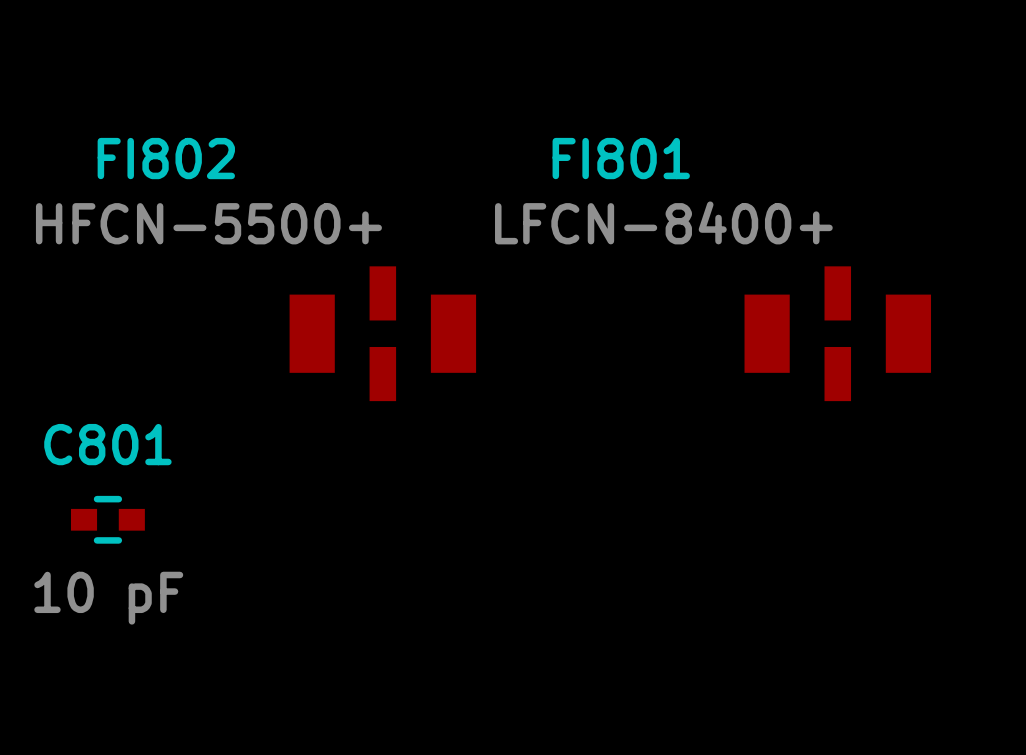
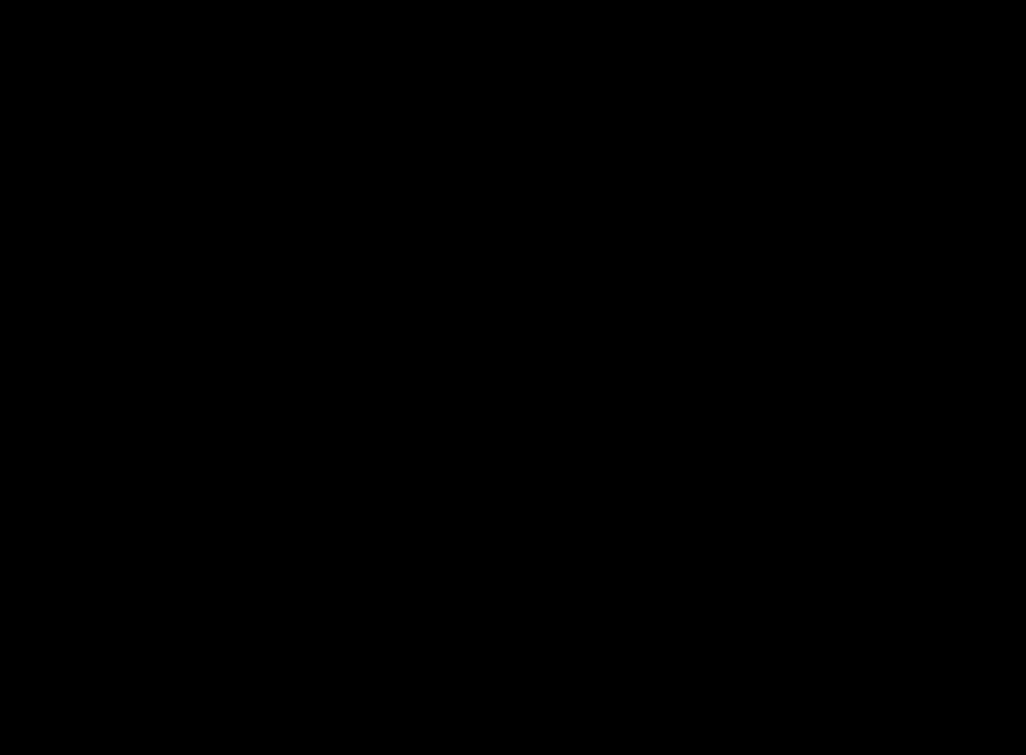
FI802: HFCN-5500+ (382, 333) -> none
FI801: LFCN-8400+ (837, 333) -> none
C801: 10 pF (107, 519) -> none

